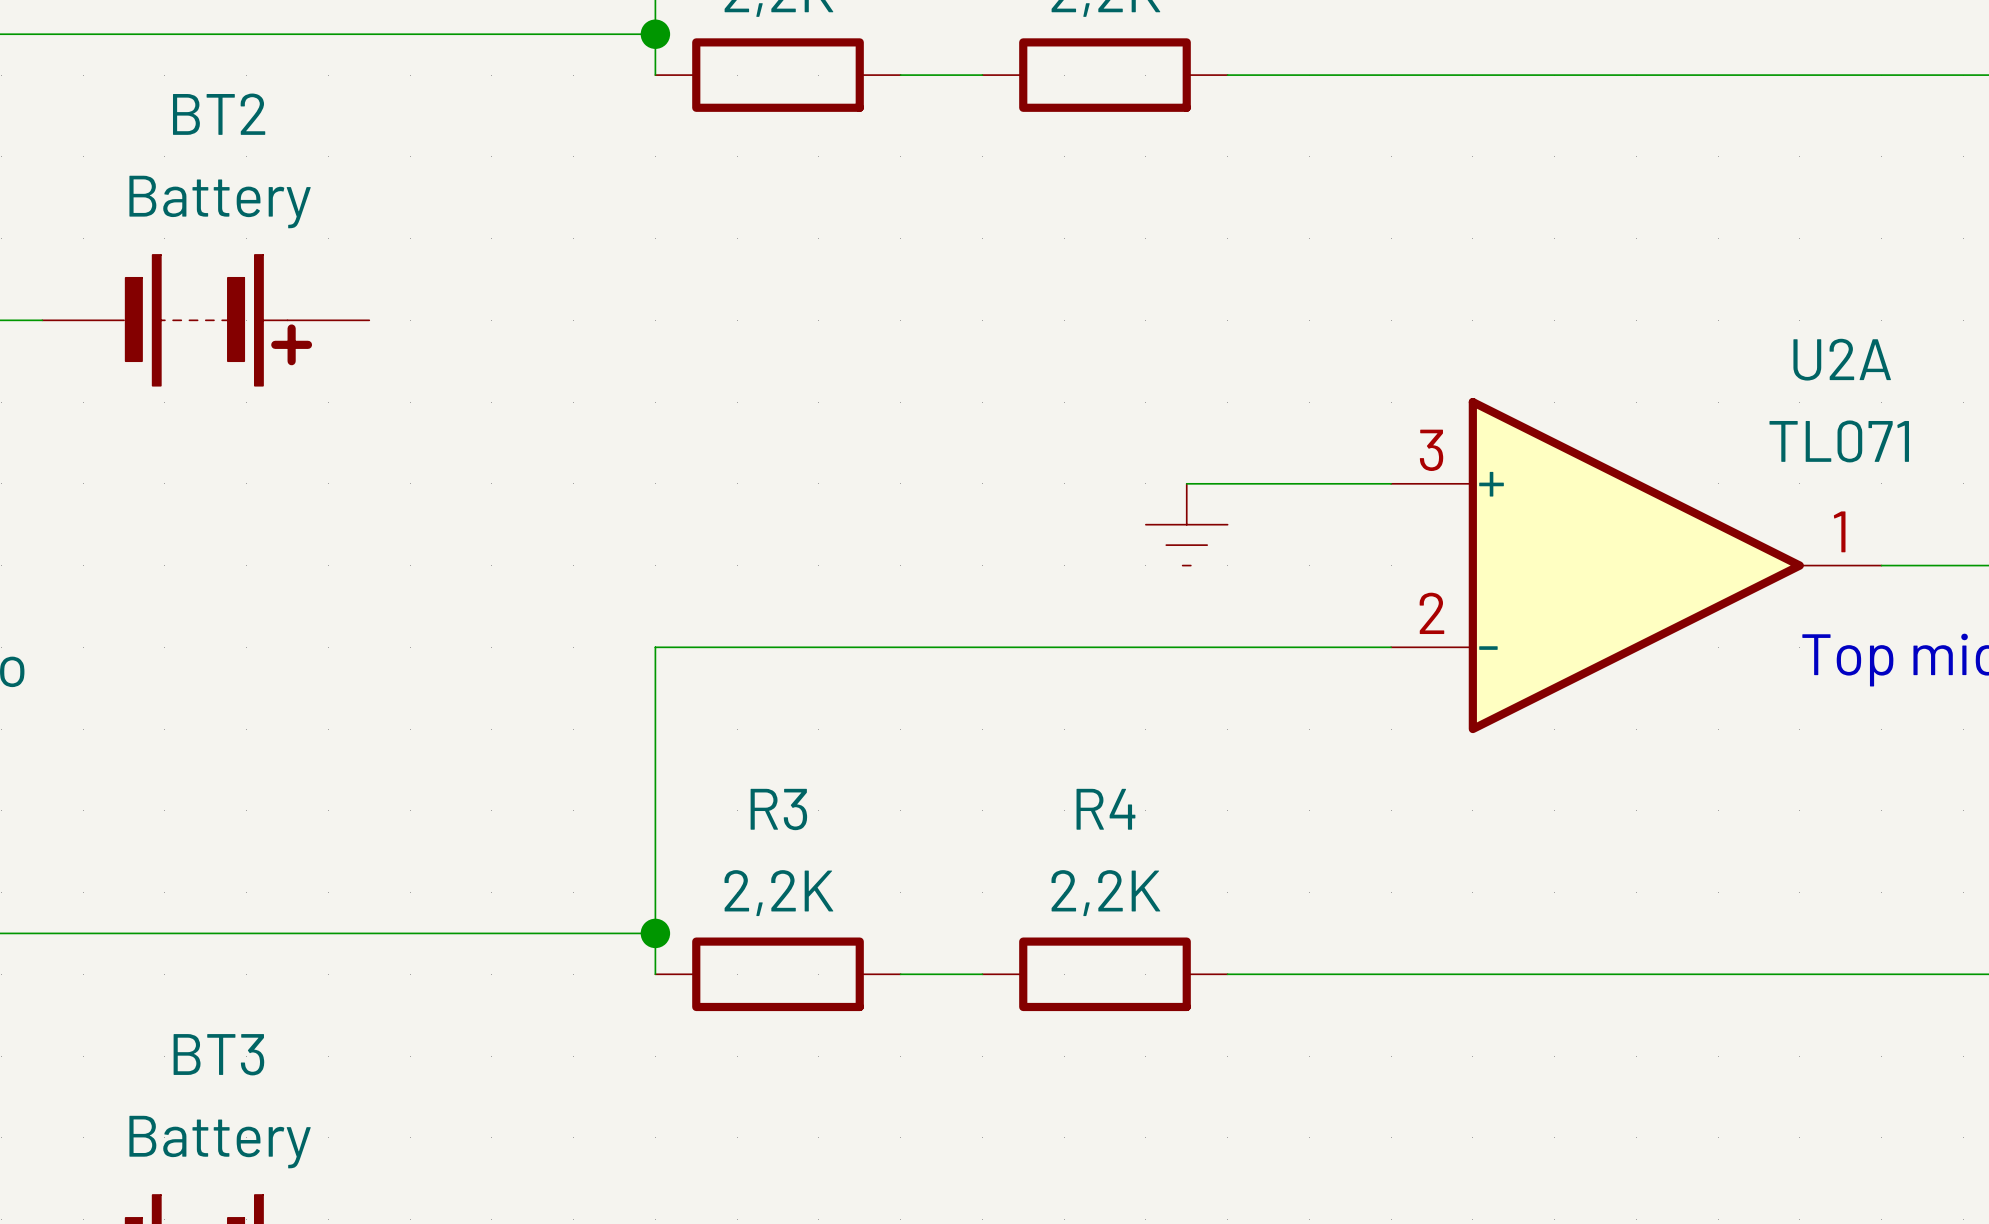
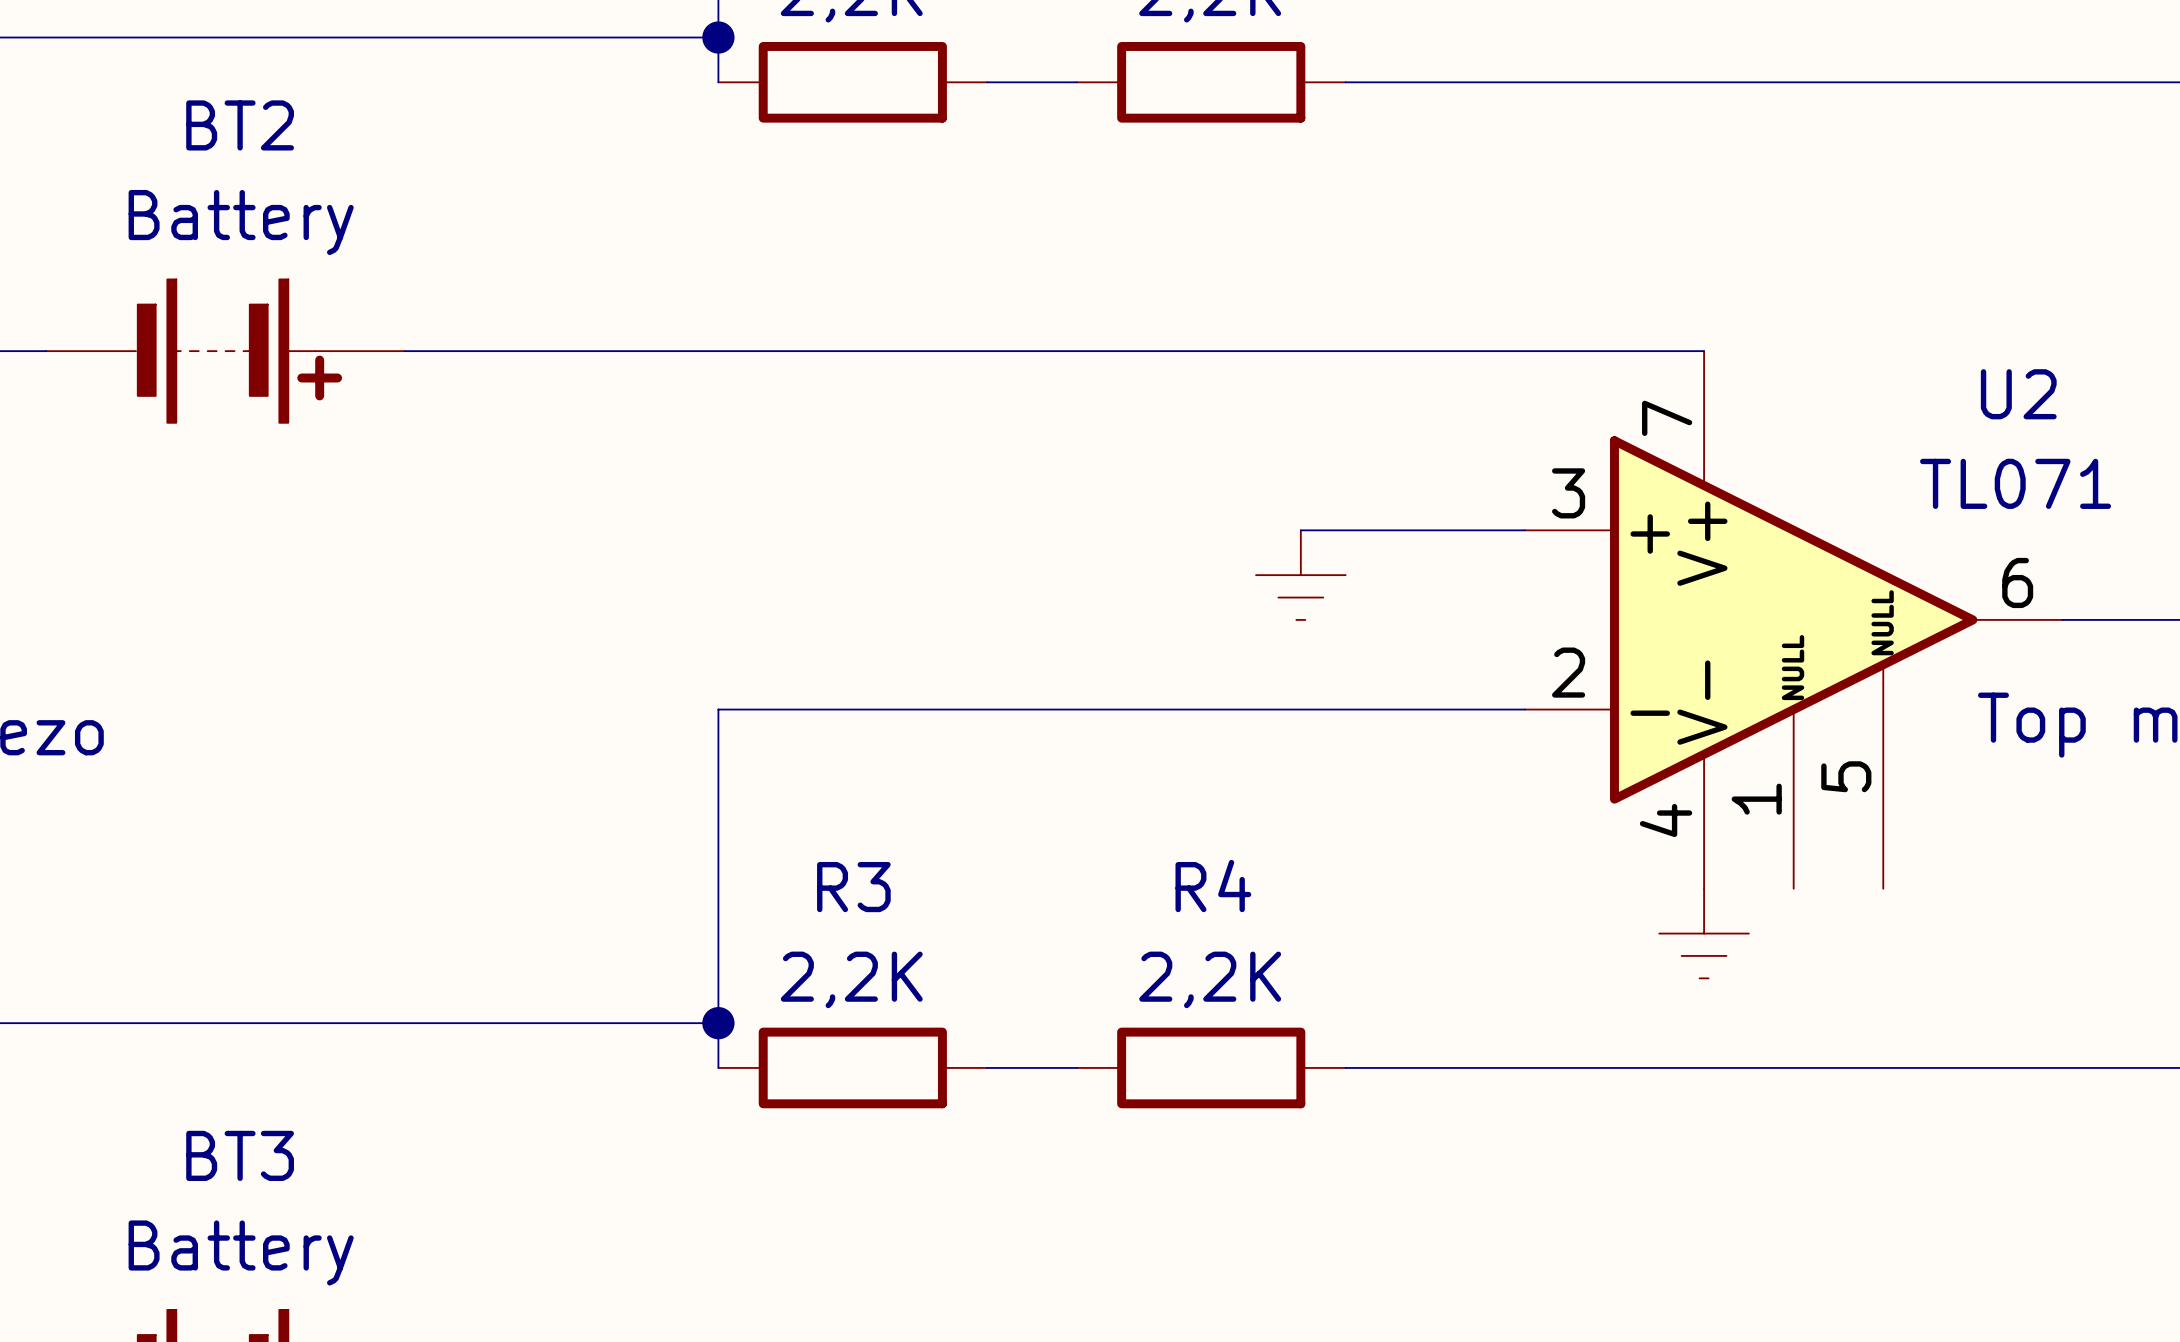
wire: none -> (404, 351) (1704, 351)
U2A: TL071 (1636, 565) -> none
U2: none -> TL071 (1793, 619)
power symbol: none -> (1704, 933)

